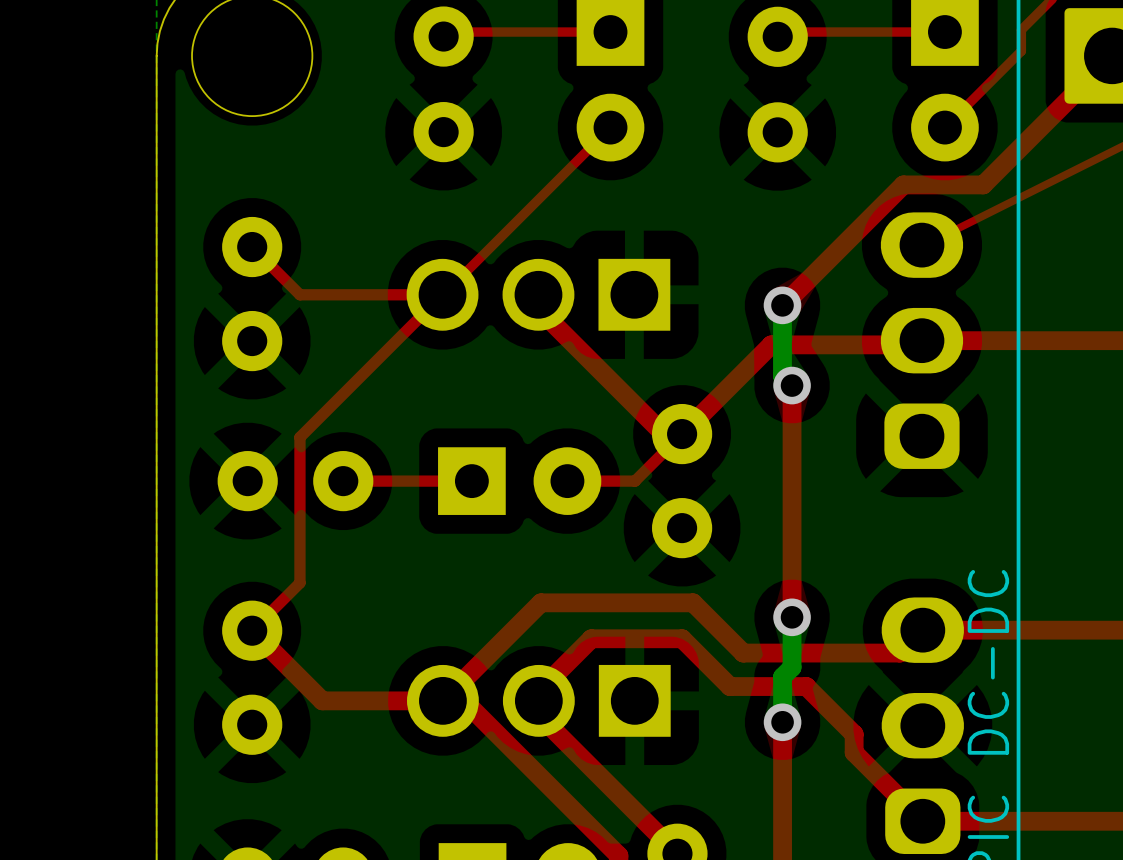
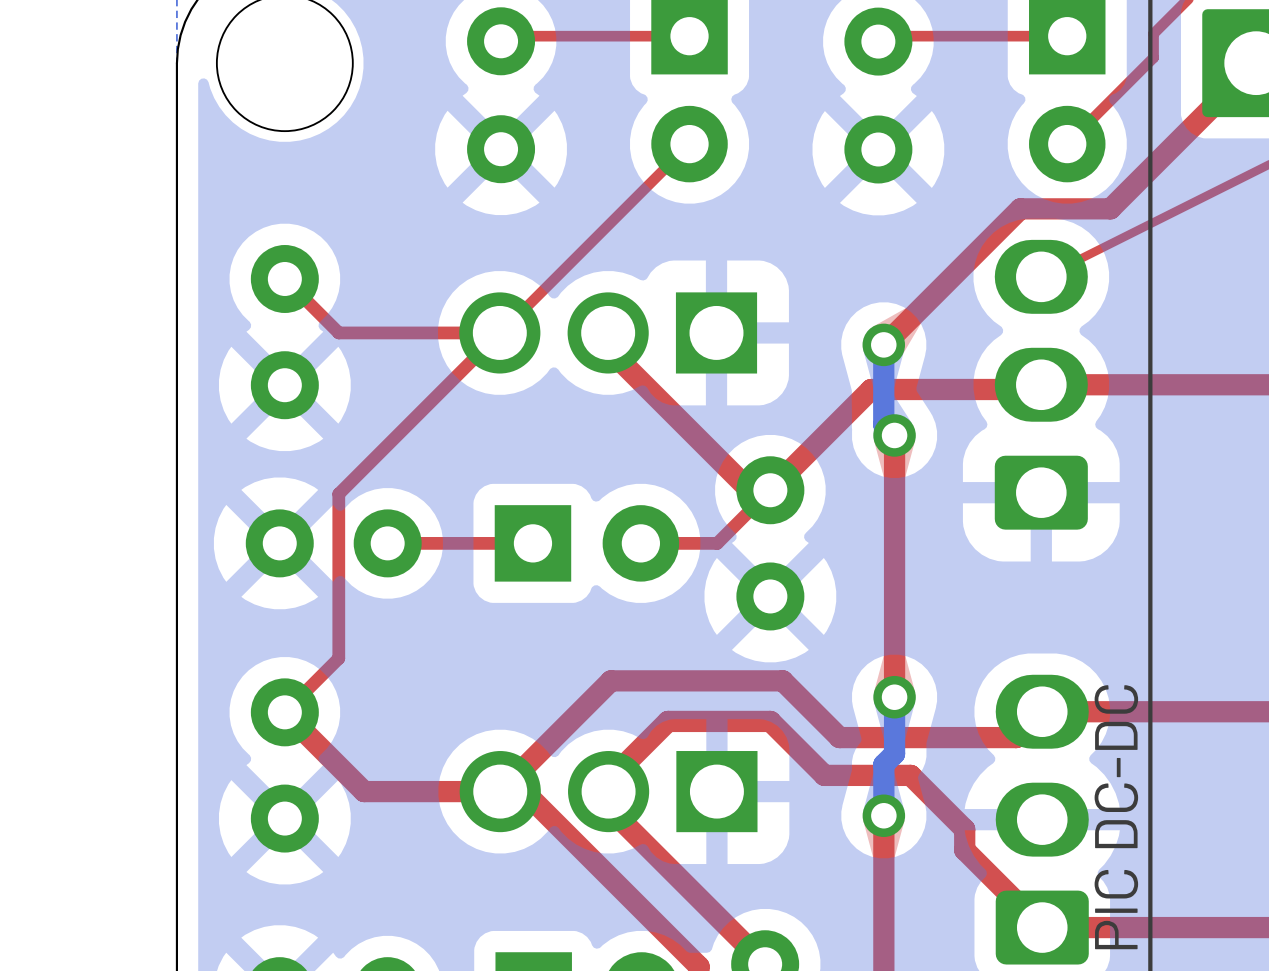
part footprint: [880, 212, 964, 469] -> [994, 239, 1088, 530]
part footprint: [881, 597, 965, 854] -> [995, 674, 1089, 965]

